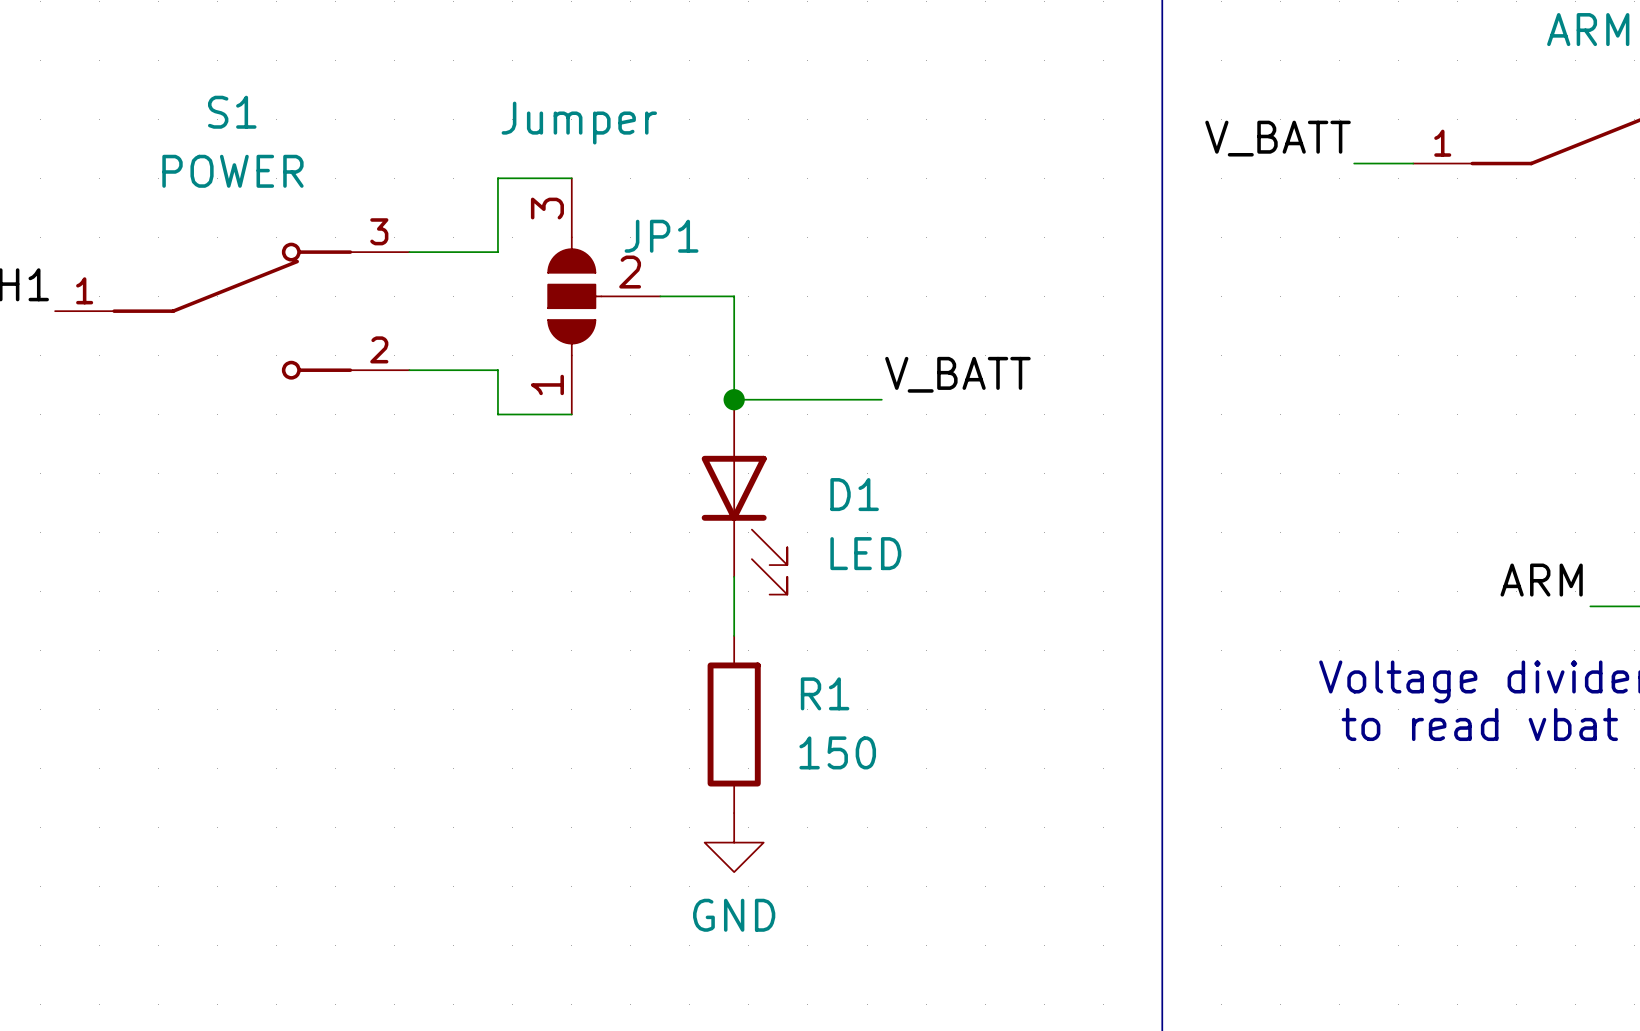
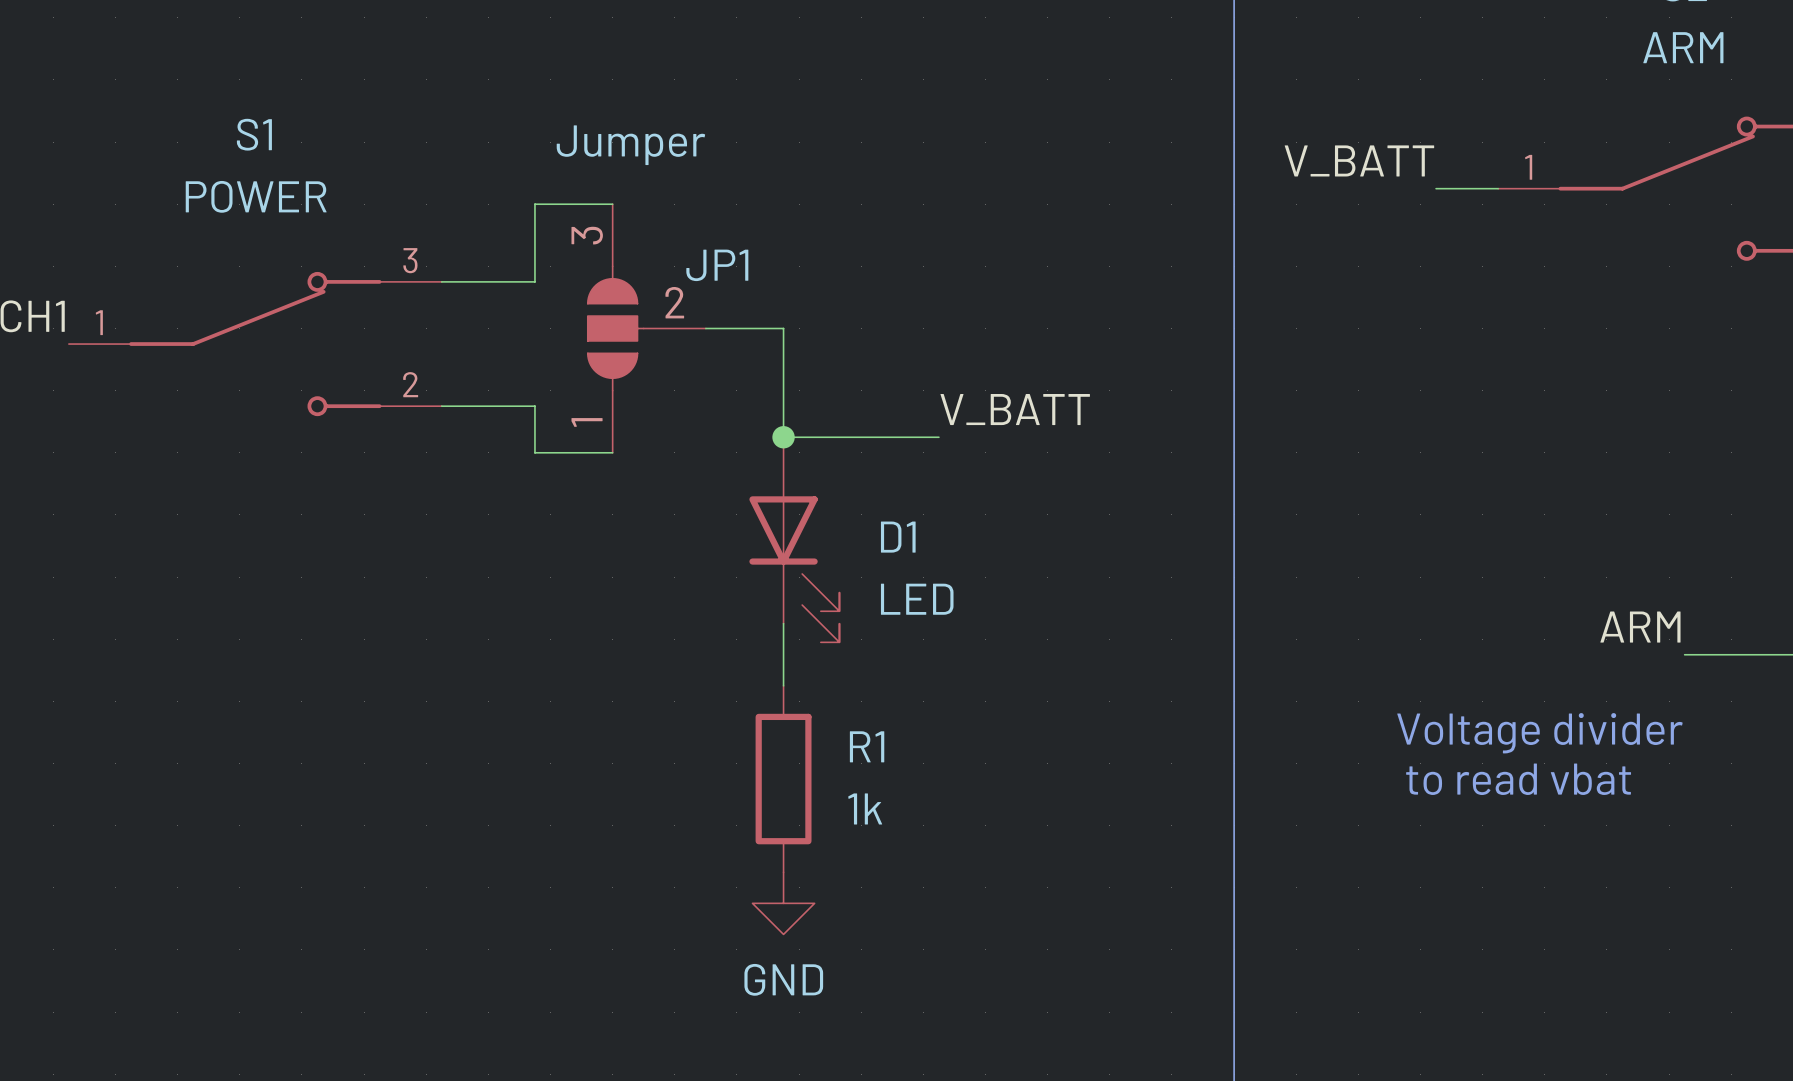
R1 value: 150 (837, 752) -> 1k (865, 808)

